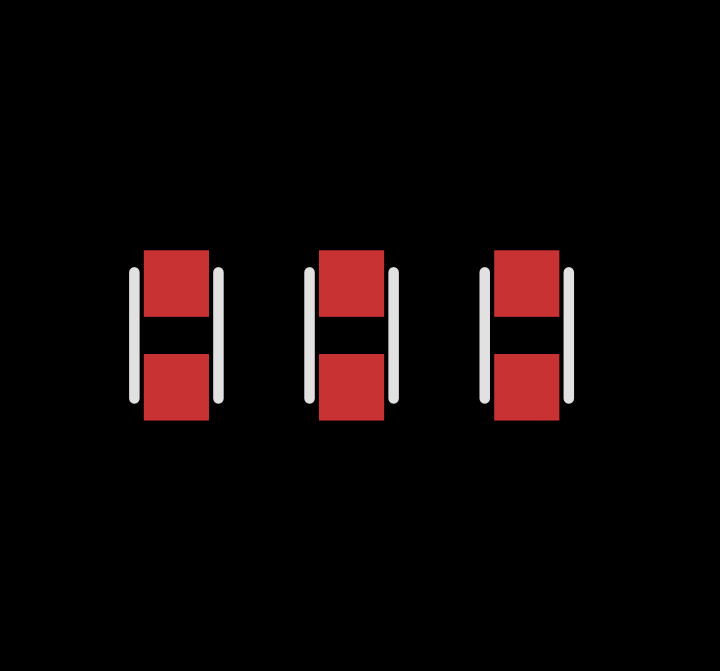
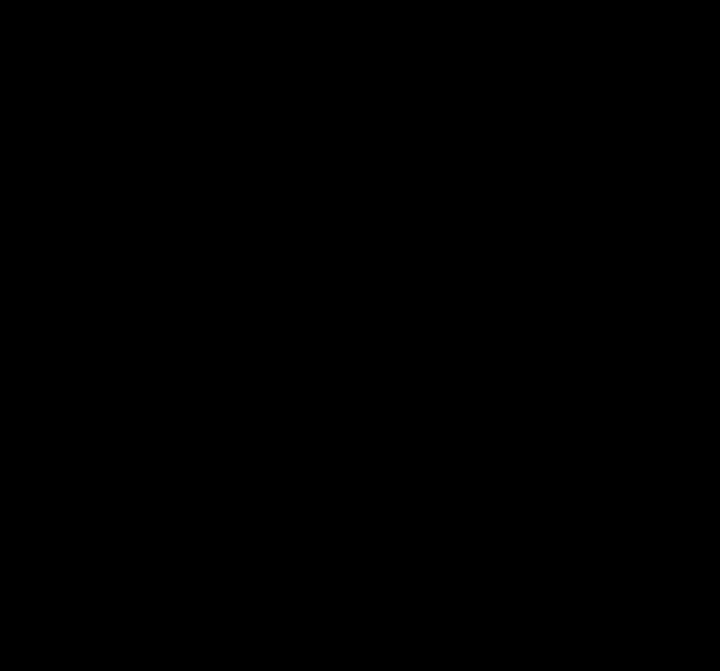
part: (176, 335) -> none
part: (351, 335) -> none
part: (526, 335) -> none

